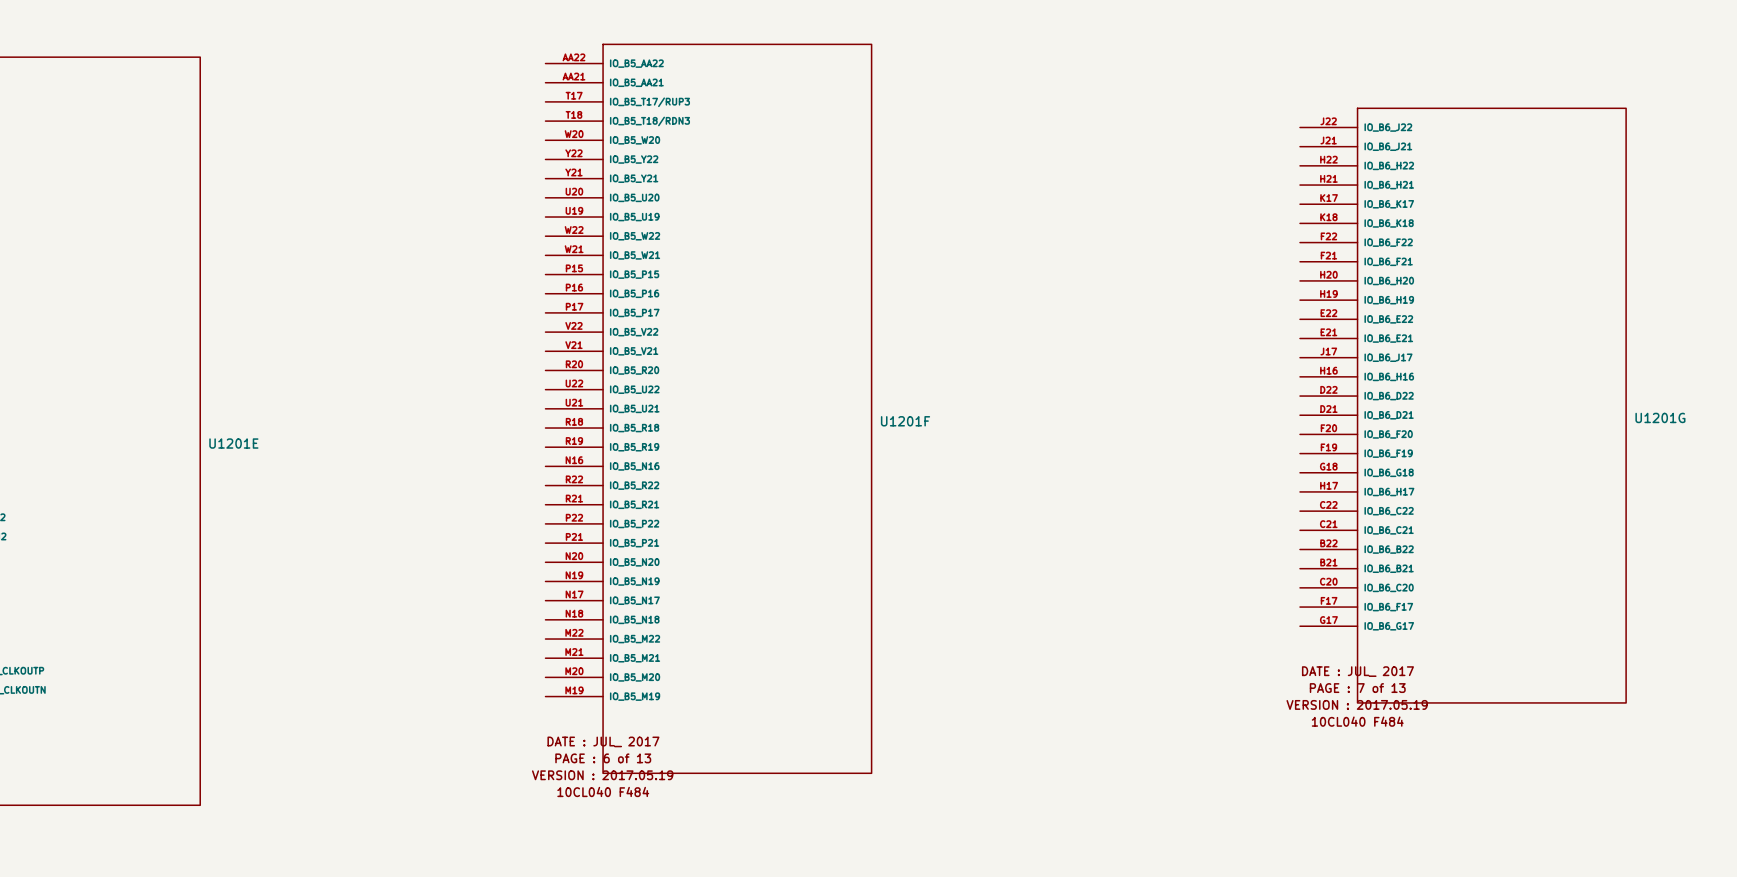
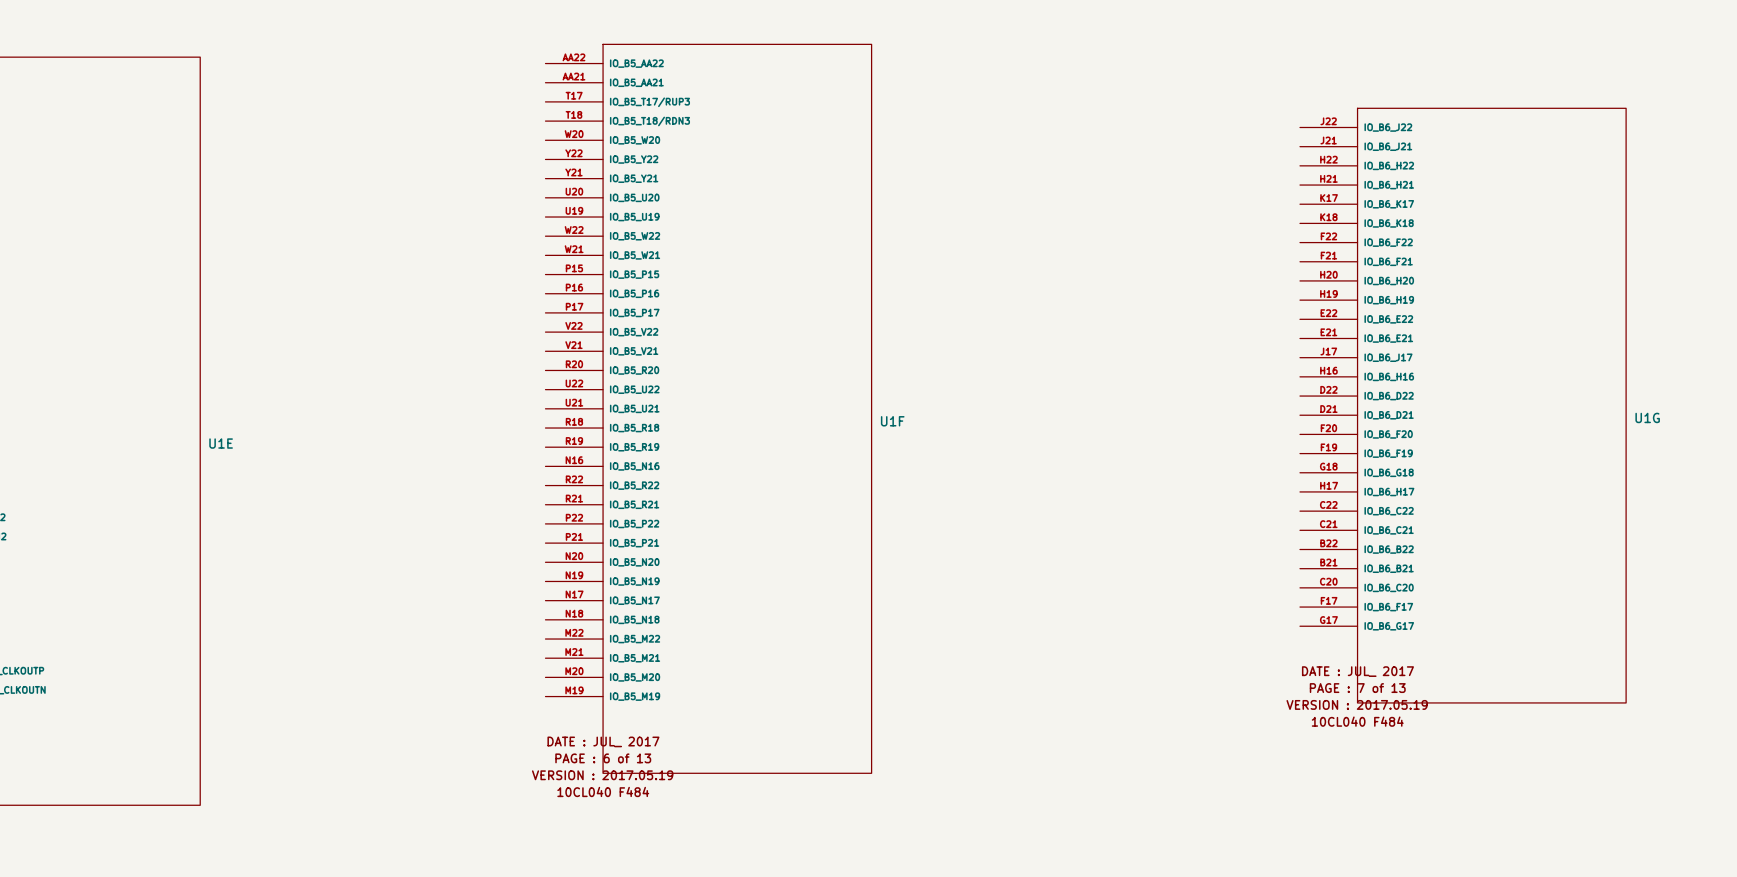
U1201G name: U1201G (1660, 417) -> U1G (1647, 417)
U1201F name: U1201F (905, 421) -> U1F (892, 421)
U1201E name: U1201E (233, 443) -> U1E (221, 443)

